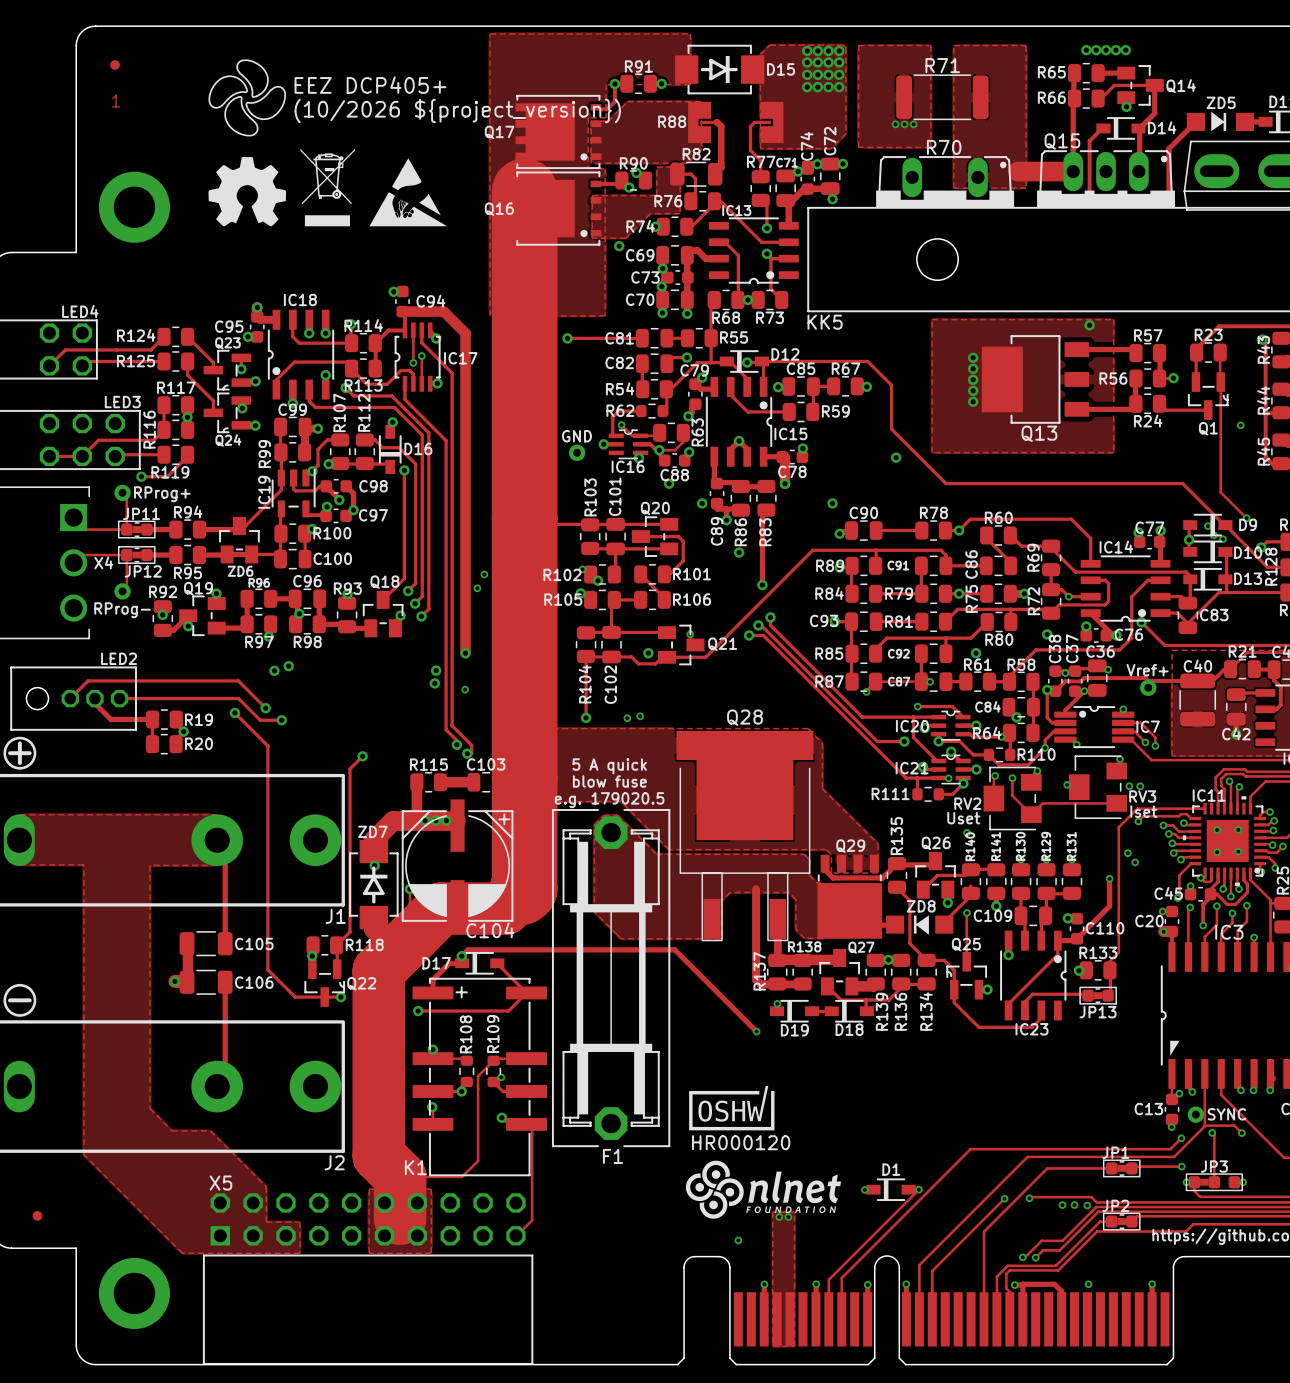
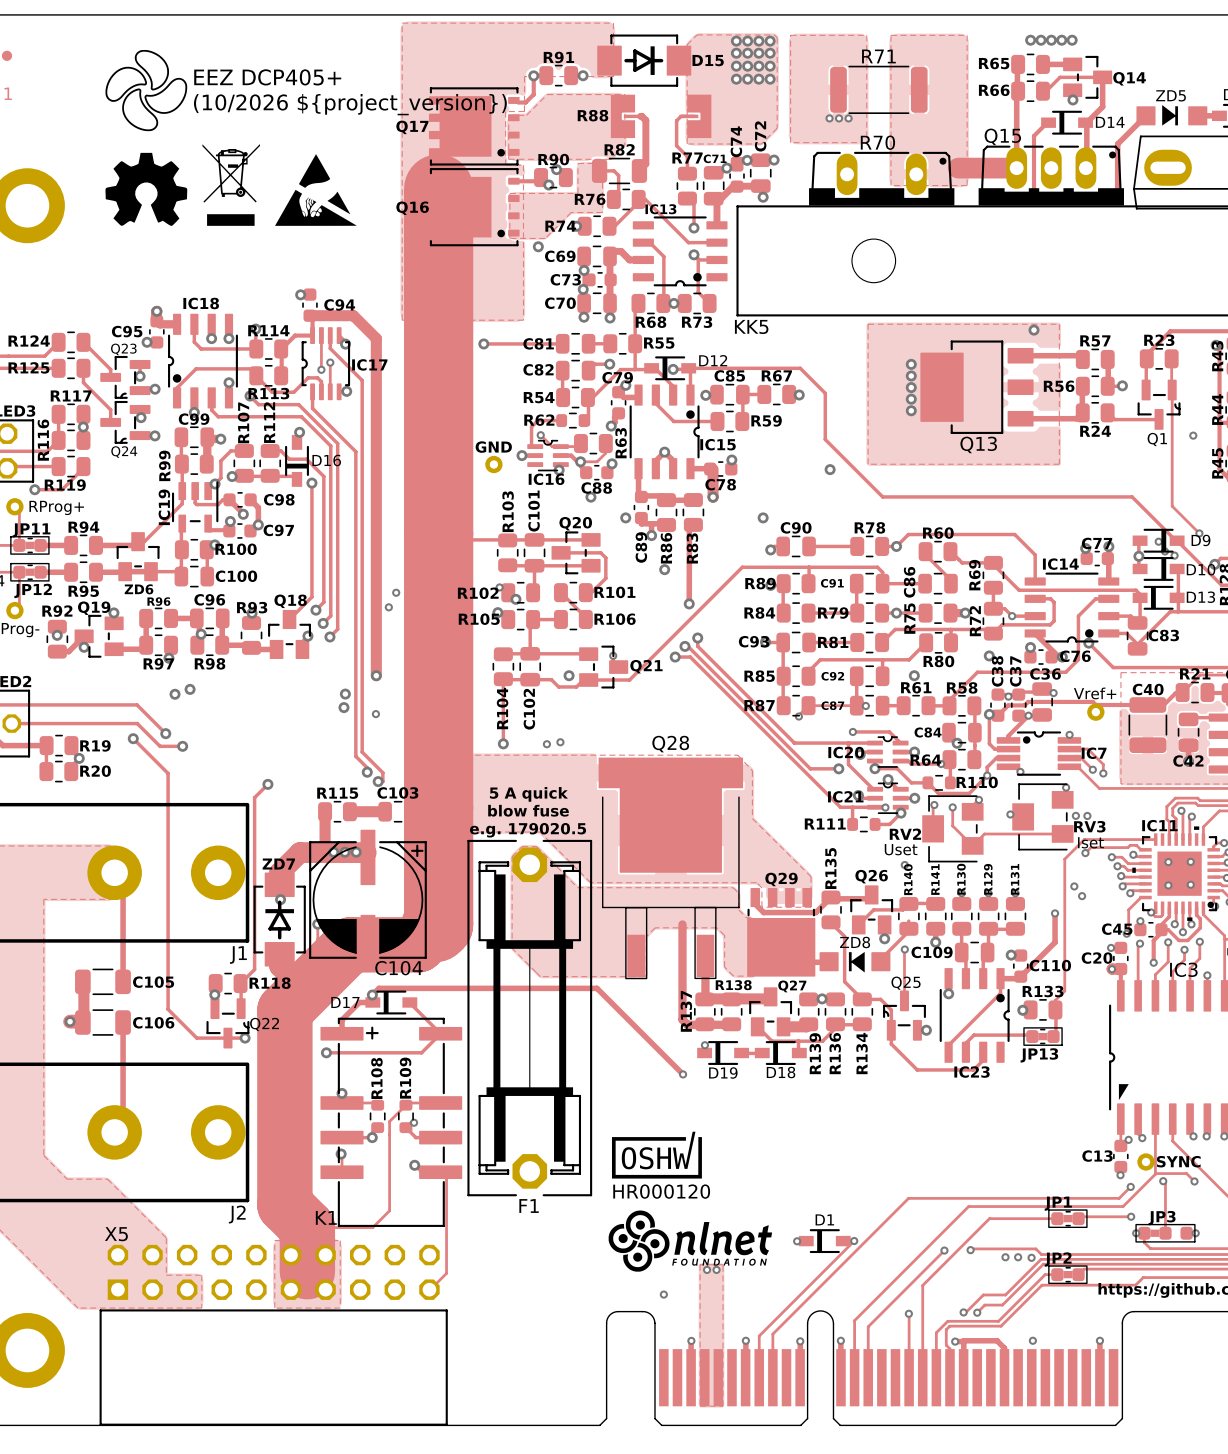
track: none -> (908, 1313) (909, 1377)
via: none -> (908, 1313)

